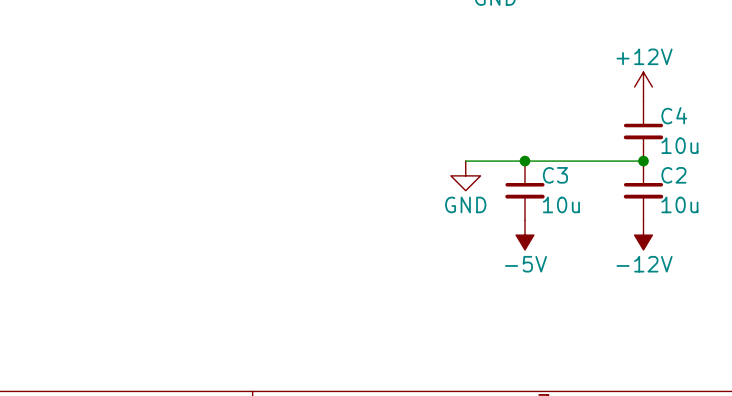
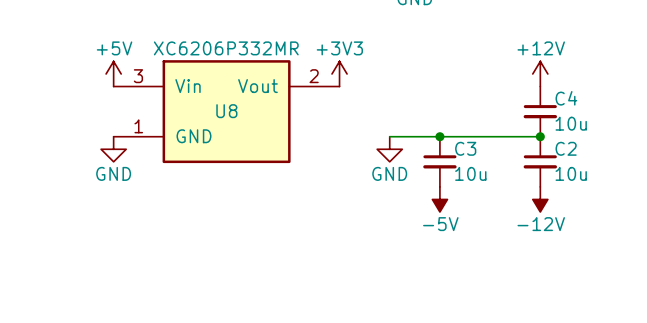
power symbol: none -> +5V (113, 73)
power symbol: none -> +3V3 (339, 73)
U8: none -> XC6206P332MR (226, 111)
power symbol: none -> GND (113, 149)

